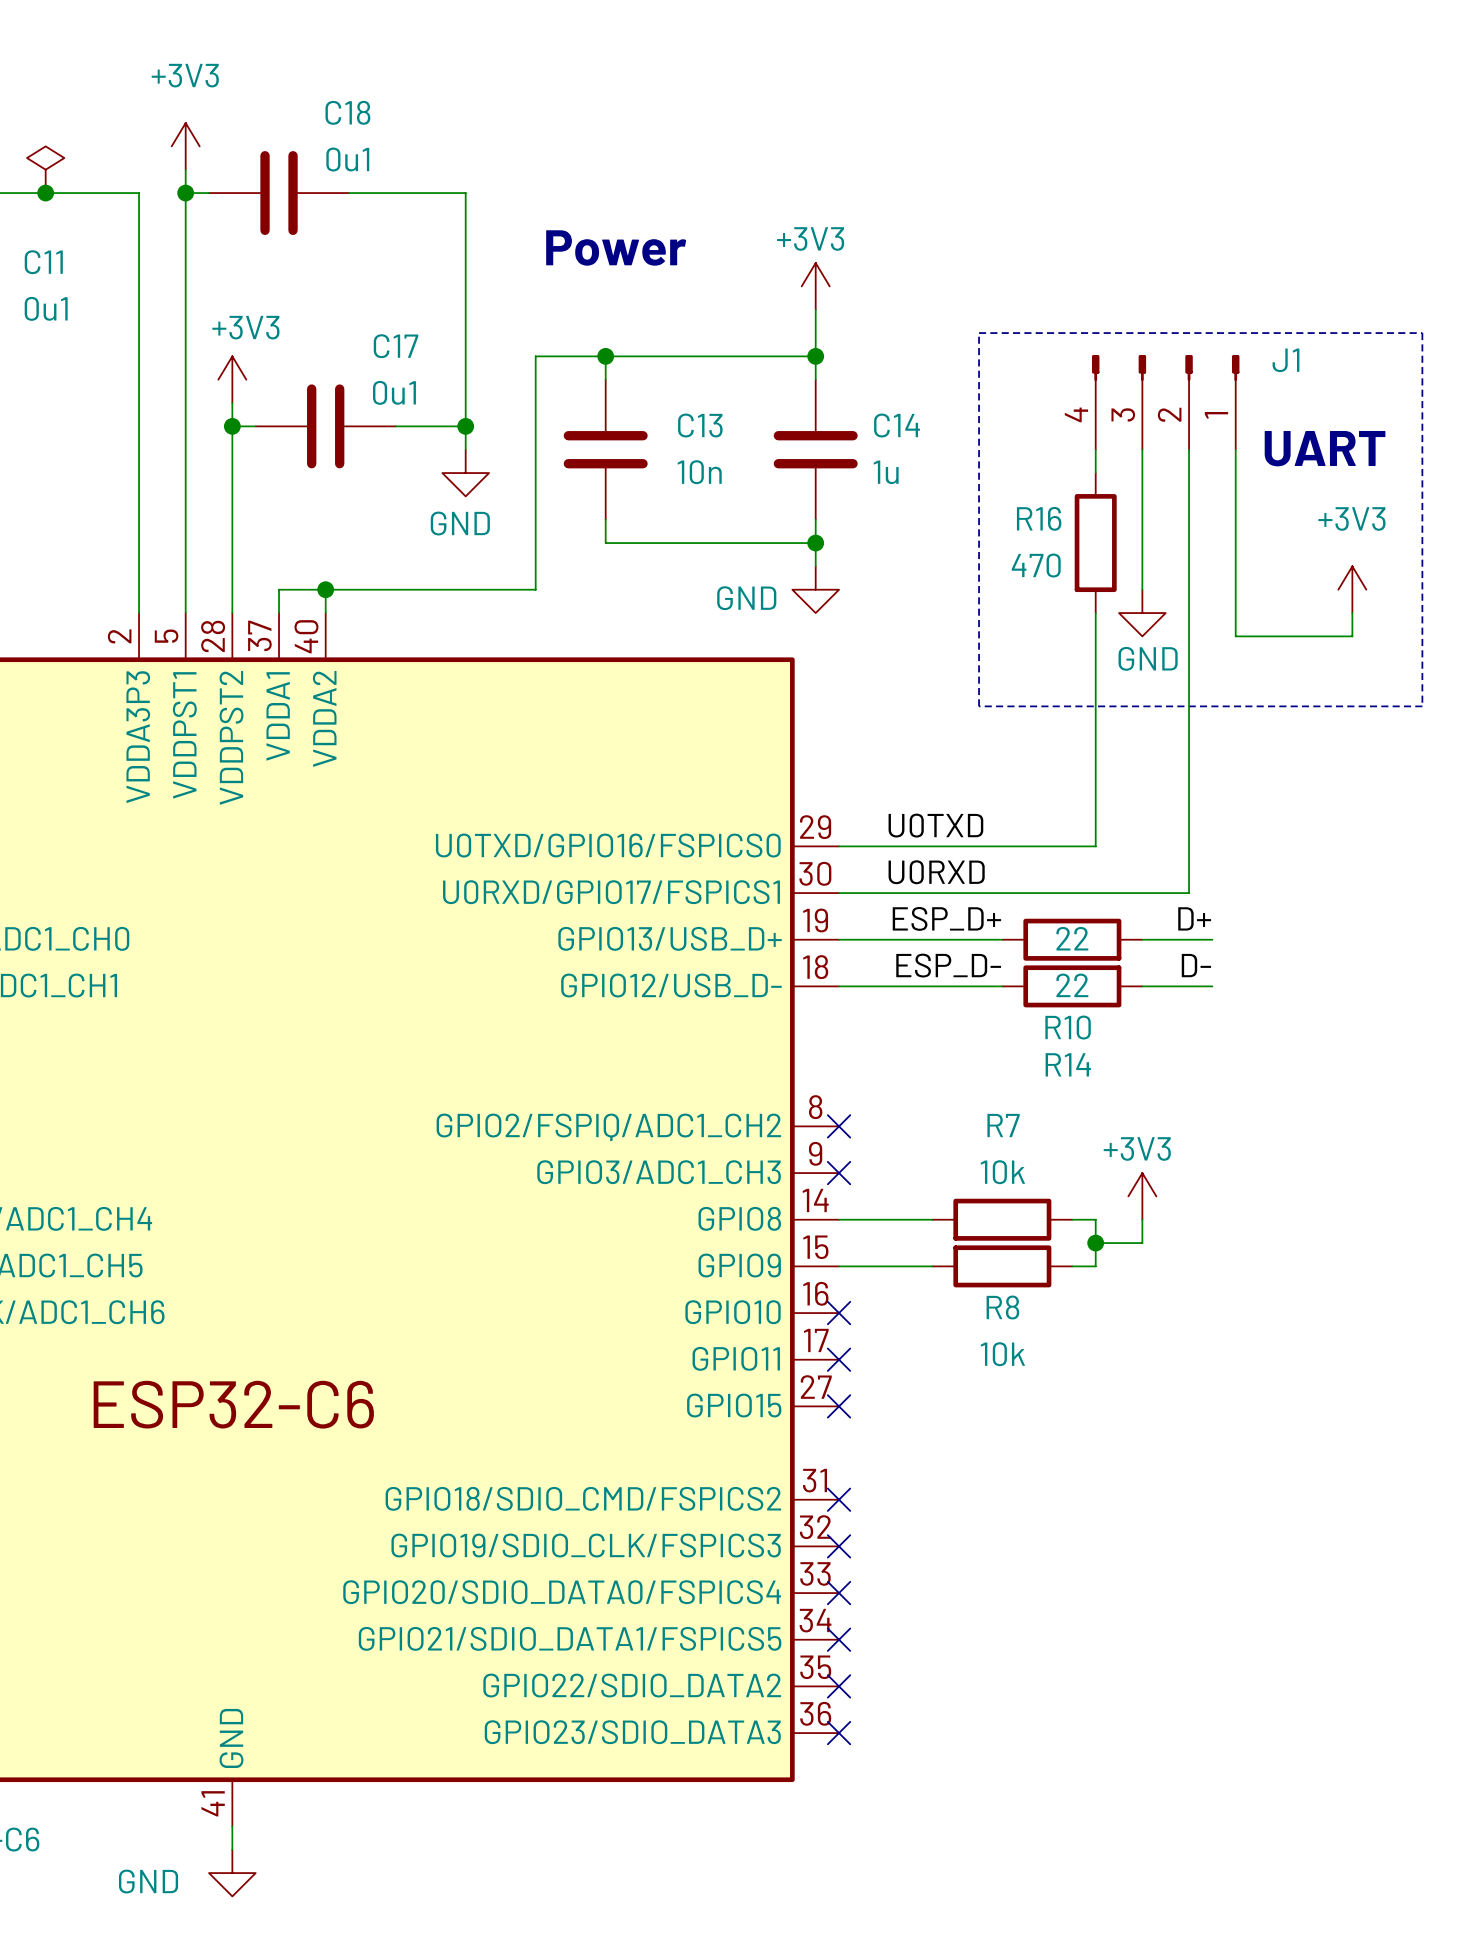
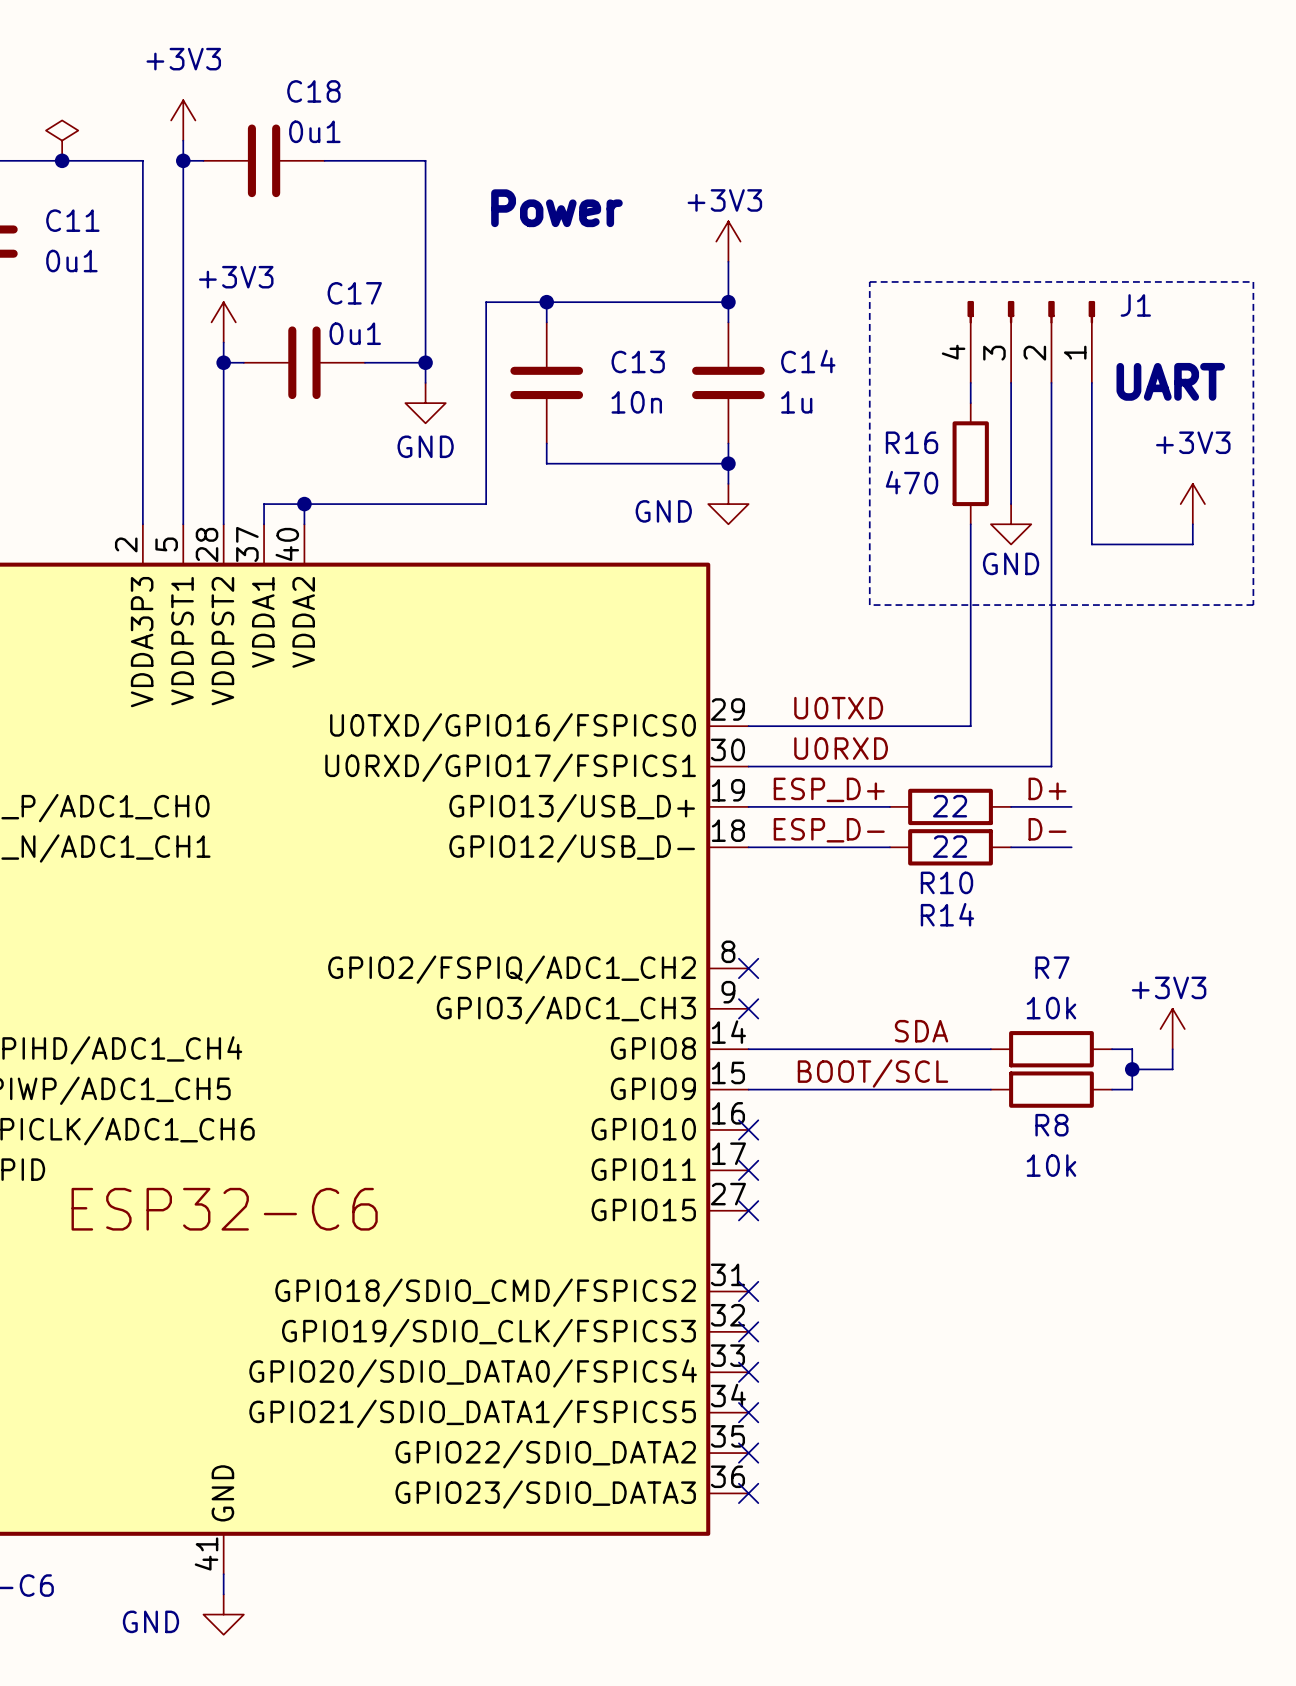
power symbol position: +3V3 (1142, 1196) -> +3V3 (1172, 1029)
label: none -> SDA (921, 1031)
wire: none -> (829, 1049) (950, 1049)
R7 position: (1002, 1219) -> (1051, 1049)
wire: (1095, 1219) (1095, 1266) -> (970, 1049) (990, 1049)
wire: (1142, 1219) (1142, 1243) (1095, 1243) -> (1172, 1049) (1172, 1069) (1132, 1069)
wire: none -> (1112, 1049) (1132, 1049) (1132, 1089) (1112, 1089)
junction: (1095, 1243) -> none
junction: none -> (1132, 1069)
label: none -> BOOT/SCL (872, 1073)
wire: none -> (829, 1089) (950, 1089)
R8 position: (1002, 1266) -> (1051, 1089)
wire: none -> (970, 1089) (990, 1089)

